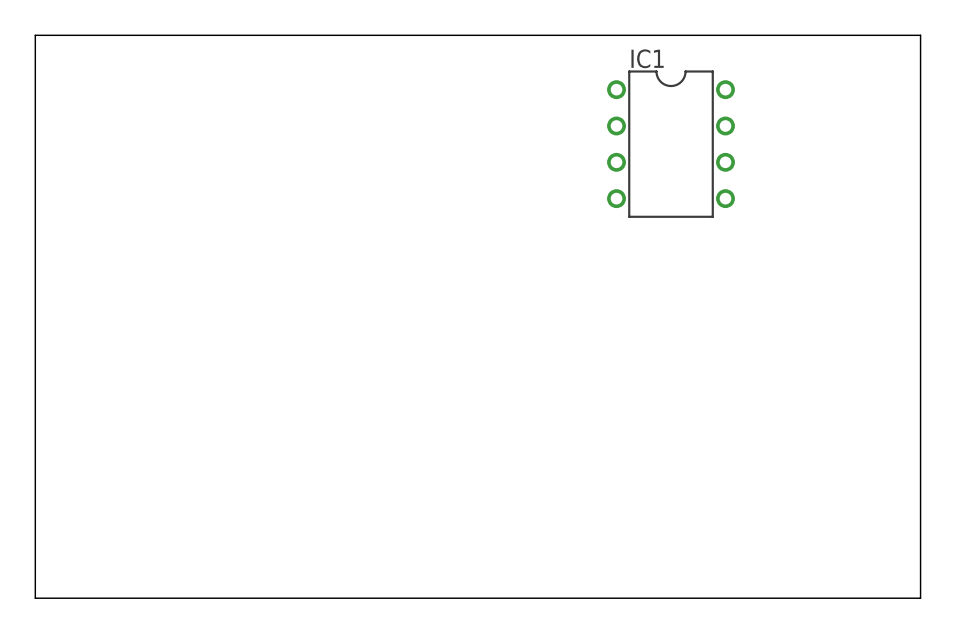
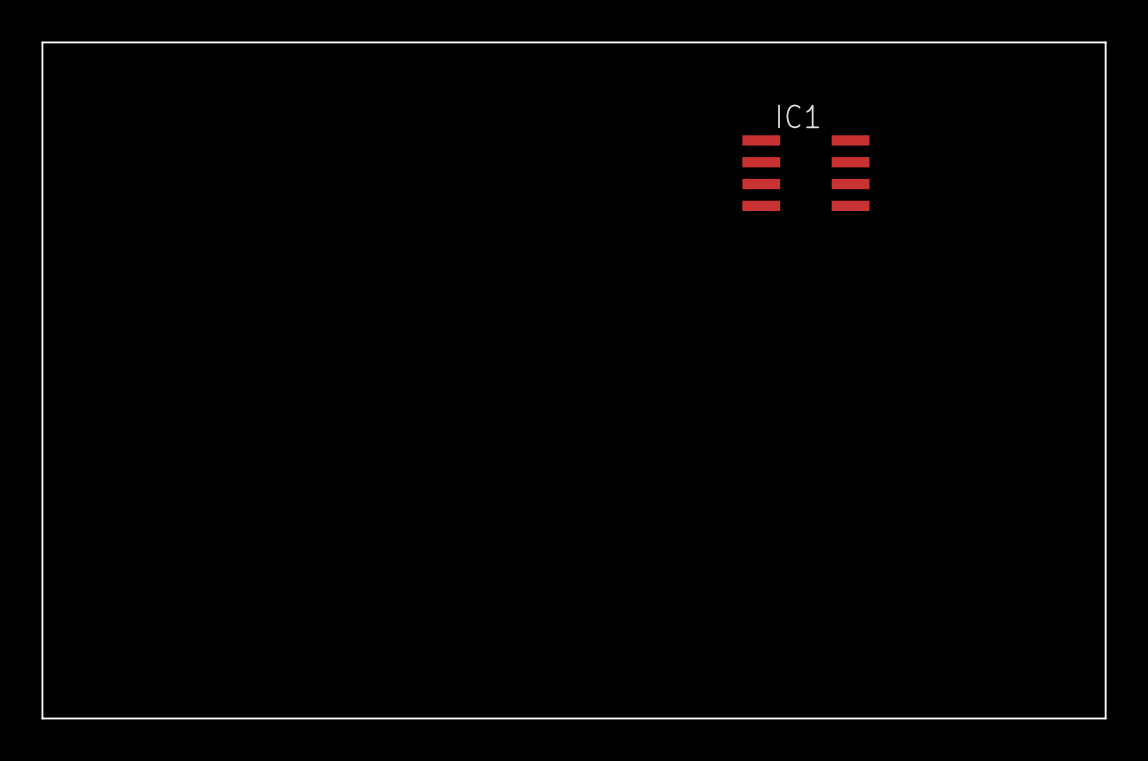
IC1 name position: IC1 (647, 58) -> IC1 (798, 116)
IC1 footprint: [607, 70, 735, 218] -> [742, 135, 870, 212]

